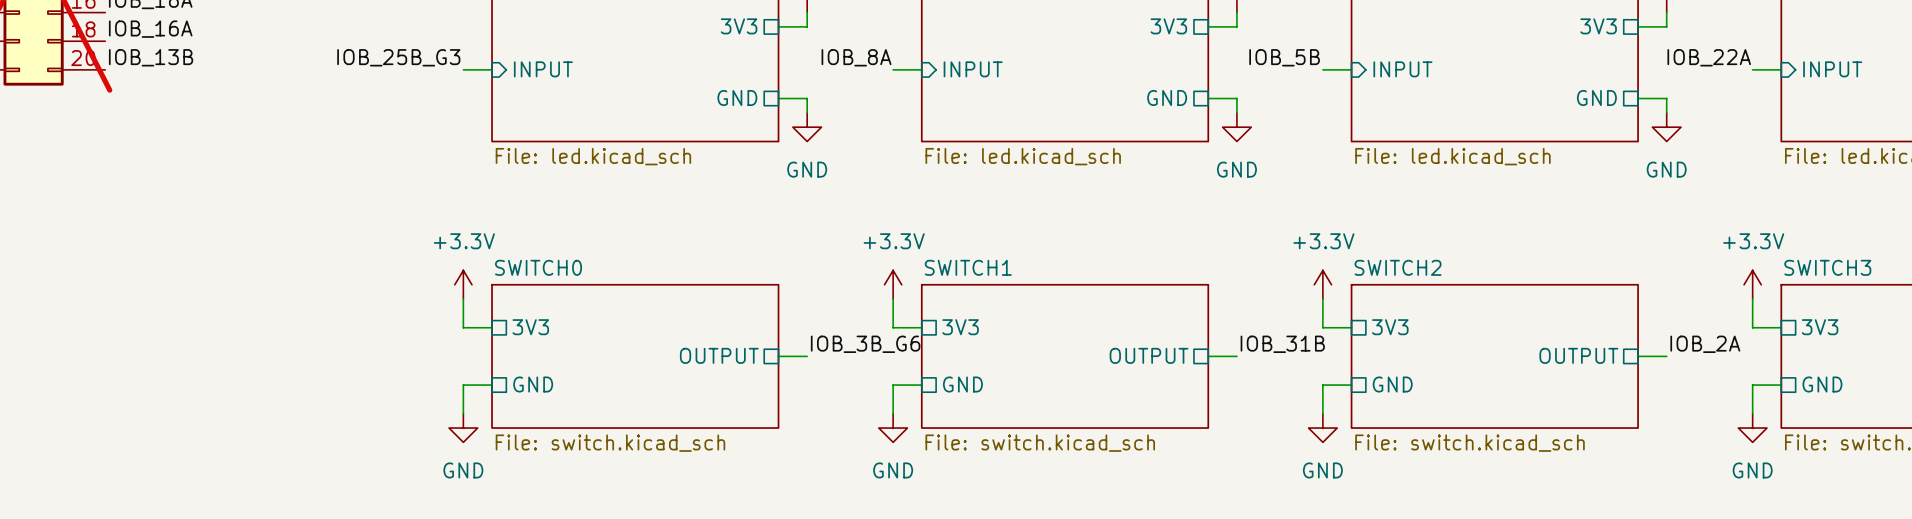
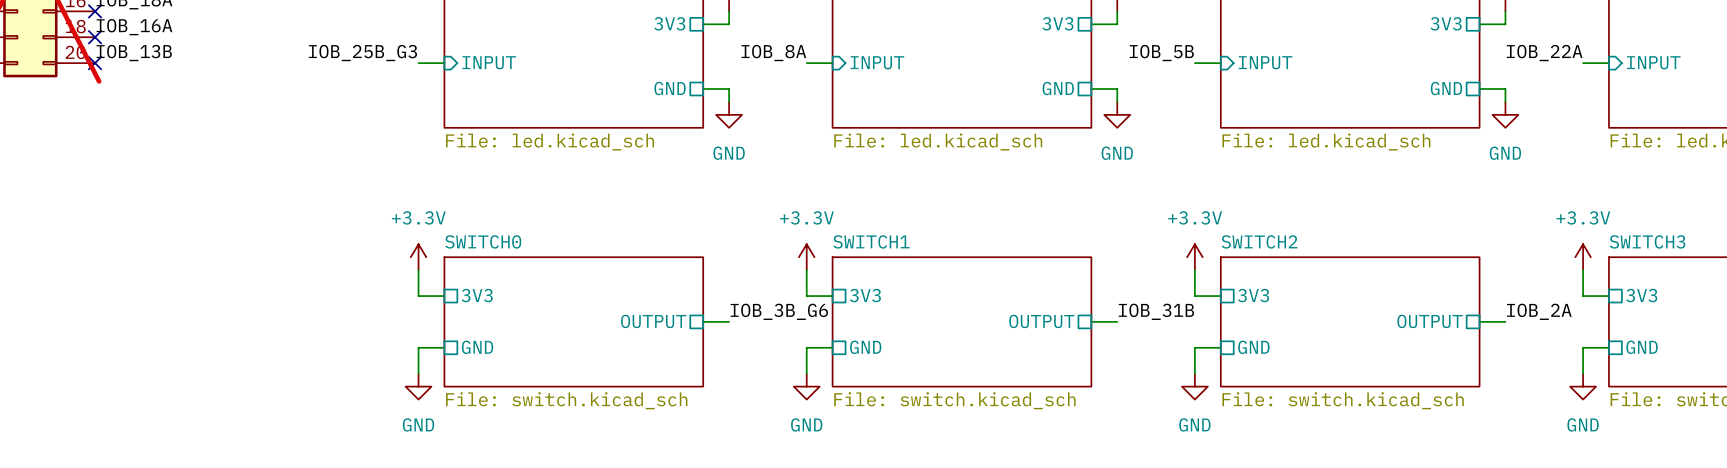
no-connect mark: none -> (95, 11)
no-connect mark: none -> (95, 37)
no-connect mark: none -> (95, 63)

